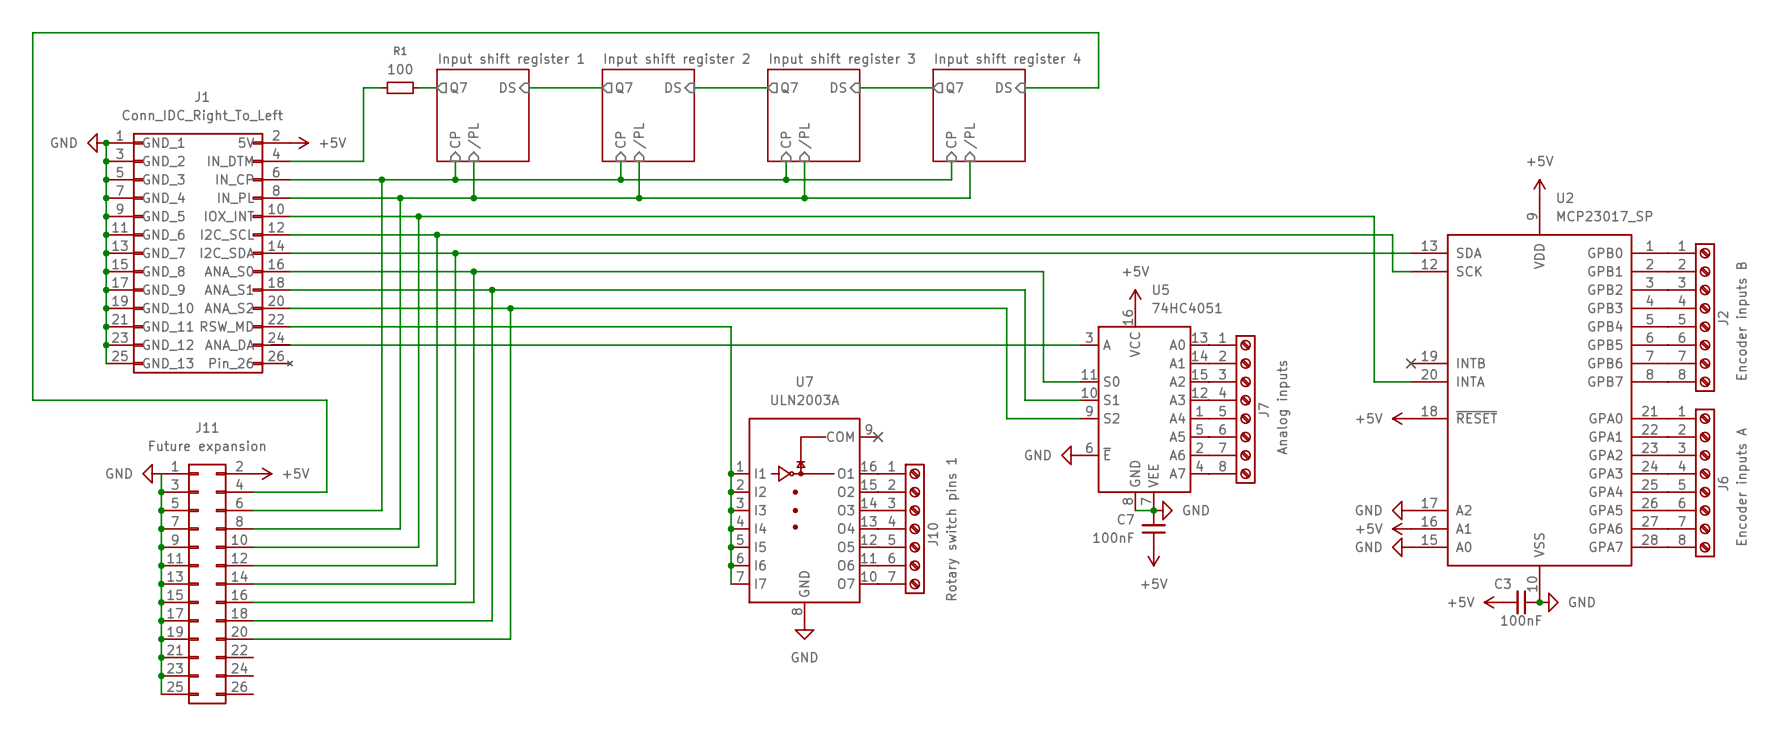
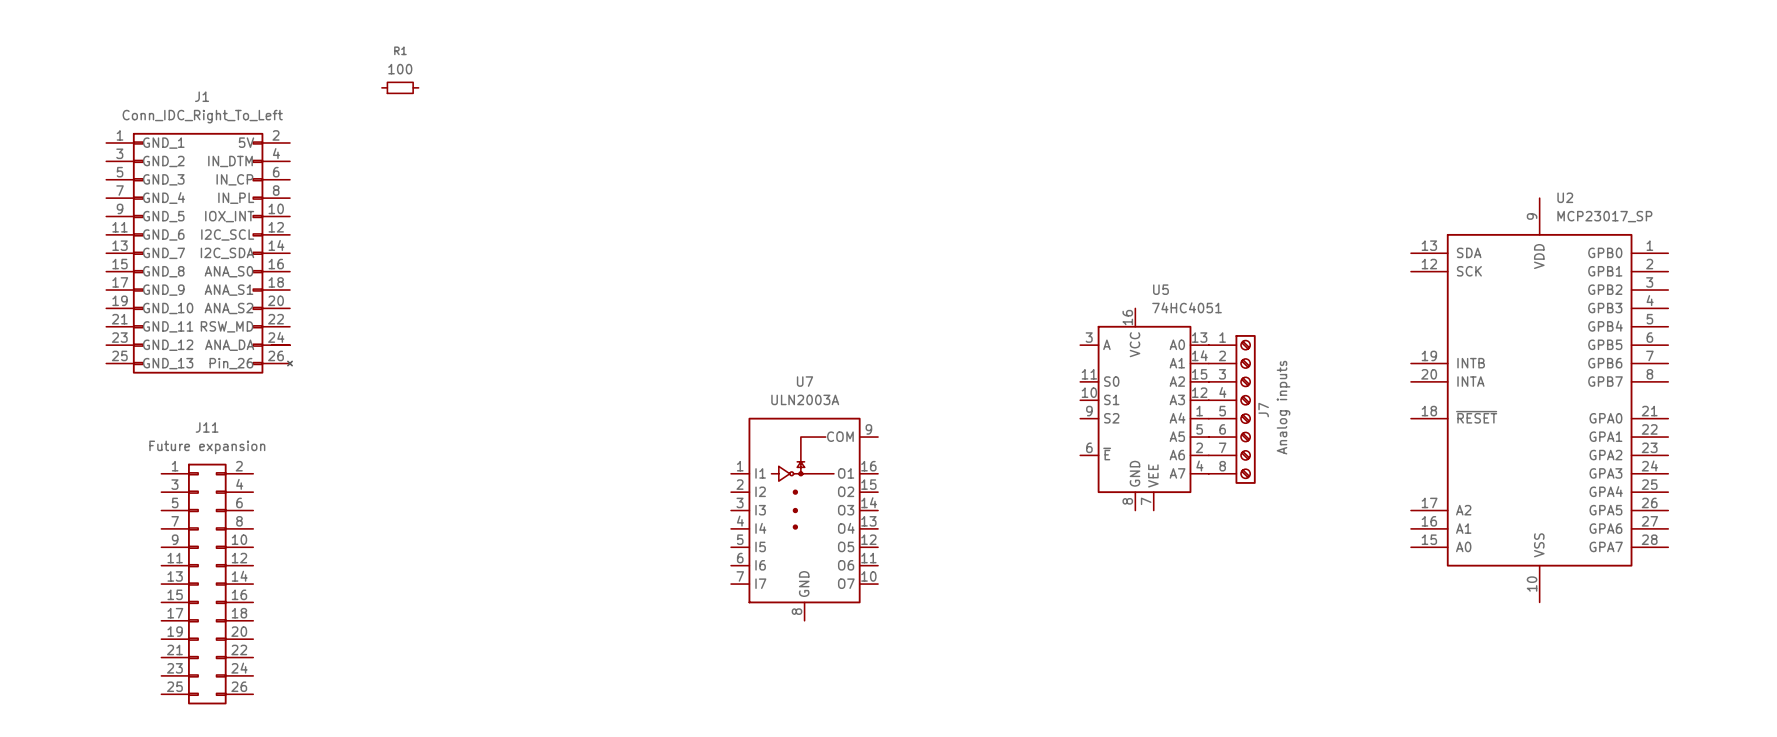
wire: (381, 87) (363, 87) (363, 161) (290, 161) -> none
wire: (418, 87) (437, 87) -> none
sheet pin: Q7 (458, 87) -> none
sheet pin: DS (507, 87) -> none
wire: (528, 87) (602, 87) -> none
sheet pin: Q7 (624, 87) -> none
sheet pin: DS (673, 87) -> none
wire: (694, 87) (767, 87) -> none
sheet pin: Q7 (789, 87) -> none
sheet pin: DS (838, 87) -> none
wire: (859, 87) (933, 87) -> none
sheet pin: Q7 (955, 87) -> none
sheet pin: DS (1003, 87) -> none
wire: (1025, 87) (1098, 87) (1098, 32) (32, 32) (32, 400) (326, 400) (326, 492) (253, 492) -> none
sheet Input shift register 1: (482, 115) -> none
sheet Input shift register 2: (648, 115) -> none
sheet Input shift register 3: (813, 115) -> none
sheet Input shift register 4: (979, 115) -> none
sheet pin: /PL (474, 135) -> none
sheet pin: /PL (639, 135) -> none
sheet pin: /PL (805, 135) -> none
sheet pin: /PL (970, 135) -> none
sheet pin: CP (455, 139) -> none
sheet pin: CP (620, 139) -> none
sheet pin: CP (785, 139) -> none
sheet pin: CP (951, 139) -> none
power symbol: GND (97, 142) -> none
wire: (106, 142) (106, 363) -> none
junction: (106, 142) -> none
power symbol: +5V (299, 142) -> none
junction: (106, 161) -> none
wire: (455, 161) (455, 179) -> none
wire: (473, 161) (473, 198) -> none
wire: (620, 161) (620, 179) -> none
wire: (639, 161) (639, 198) -> none
wire: (786, 161) (786, 179) -> none
wire: (804, 161) (804, 198) -> none
wire: (951, 161) (951, 179) (290, 179) -> none
wire: (969, 161) (969, 198) (290, 198) -> none
junction: (106, 179) -> none
wire: (381, 179) (381, 510) (253, 510) -> none
junction: (381, 179) -> none
junction: (455, 179) -> none
junction: (620, 179) -> none
junction: (786, 179) -> none
power symbol: +5V (1539, 188) -> none
junction: (106, 198) -> none
wire: (400, 198) (400, 528) (253, 528) -> none
junction: (400, 198) -> none
junction: (473, 198) -> none
junction: (639, 198) -> none
junction: (804, 198) -> none
junction: (106, 216) -> none
wire: (290, 216) (1374, 216) (1374, 381) (1411, 381) -> none
wire: (418, 216) (418, 547) (253, 547) -> none
junction: (418, 216) -> none
junction: (106, 234) -> none
wire: (290, 234) (1392, 234) (1392, 271) (1411, 271) -> none
wire: (437, 234) (437, 565) (253, 565) -> none
junction: (437, 234) -> none
junction: (106, 253) -> none
wire: (290, 253) (1411, 253) -> none
wire: (455, 253) (455, 584) (253, 584) -> none
junction: (455, 253) -> none
junction: (106, 271) -> none
wire: (290, 271) (1043, 271) (1043, 381) (1080, 381) -> none
wire: (473, 271) (473, 602) (253, 602) -> none
junction: (473, 271) -> none
junction: (106, 290) -> none
wire: (290, 290) (1025, 290) (1025, 400) (1080, 400) -> none
wire: (492, 290) (492, 620) (253, 620) -> none
junction: (492, 290) -> none
power symbol: +5V (1135, 299) -> none
junction: (106, 308) -> none
wire: (290, 308) (1006, 308) (1006, 418) (1080, 418) -> none
wire: (510, 308) (510, 639) (253, 639) -> none
junction: (510, 308) -> none
J2: Encoder inputs B (1691, 317) -> none
junction: (106, 326) -> none
wire: (290, 326) (731, 326) (731, 584) -> none
junction: (106, 345) -> none
wire: (290, 345) (1080, 345) -> none
no-connect mark: (1411, 363) -> none
power symbol: +5V (1401, 418) -> none
no-connect mark: (878, 437) -> none
power symbol: GND (1071, 455) -> none
power symbol: GND (152, 473) -> none
wire: (161, 473) (161, 694) -> none
power symbol: +5V (262, 473) -> none
junction: (731, 473) -> none
J6: Encoder inputs A (1691, 482) -> none
junction: (161, 492) -> none
junction: (731, 492) -> none
junction: (161, 510) -> none
junction: (731, 510) -> none
wire: (1135, 510) (1153, 510) -> none
junction: (1153, 510) -> none
power symbol: GND (1162, 510) -> none
power symbol: GND (1401, 510) -> none
junction: (161, 528) -> none
junction: (731, 528) -> none
J10: Rotary switch pins 1 (901, 528) -> none
C7: 100nF (1153, 528) -> none
power symbol: +5V (1401, 528) -> none
junction: (161, 547) -> none
junction: (731, 547) -> none
power symbol: GND (1401, 547) -> none
power symbol: +5V (1153, 556) -> none
junction: (161, 565) -> none
junction: (731, 565) -> none
junction: (161, 584) -> none
junction: (161, 602) -> none
power symbol: +5V (1493, 602) -> none
C3: 100nF (1521, 602) -> none
junction: (1539, 602) -> none
power symbol: GND (1548, 602) -> none
junction: (161, 620) -> none
power symbol: GND (804, 629) -> none
junction: (161, 639) -> none
junction: (161, 657) -> none
junction: (161, 675) -> none

